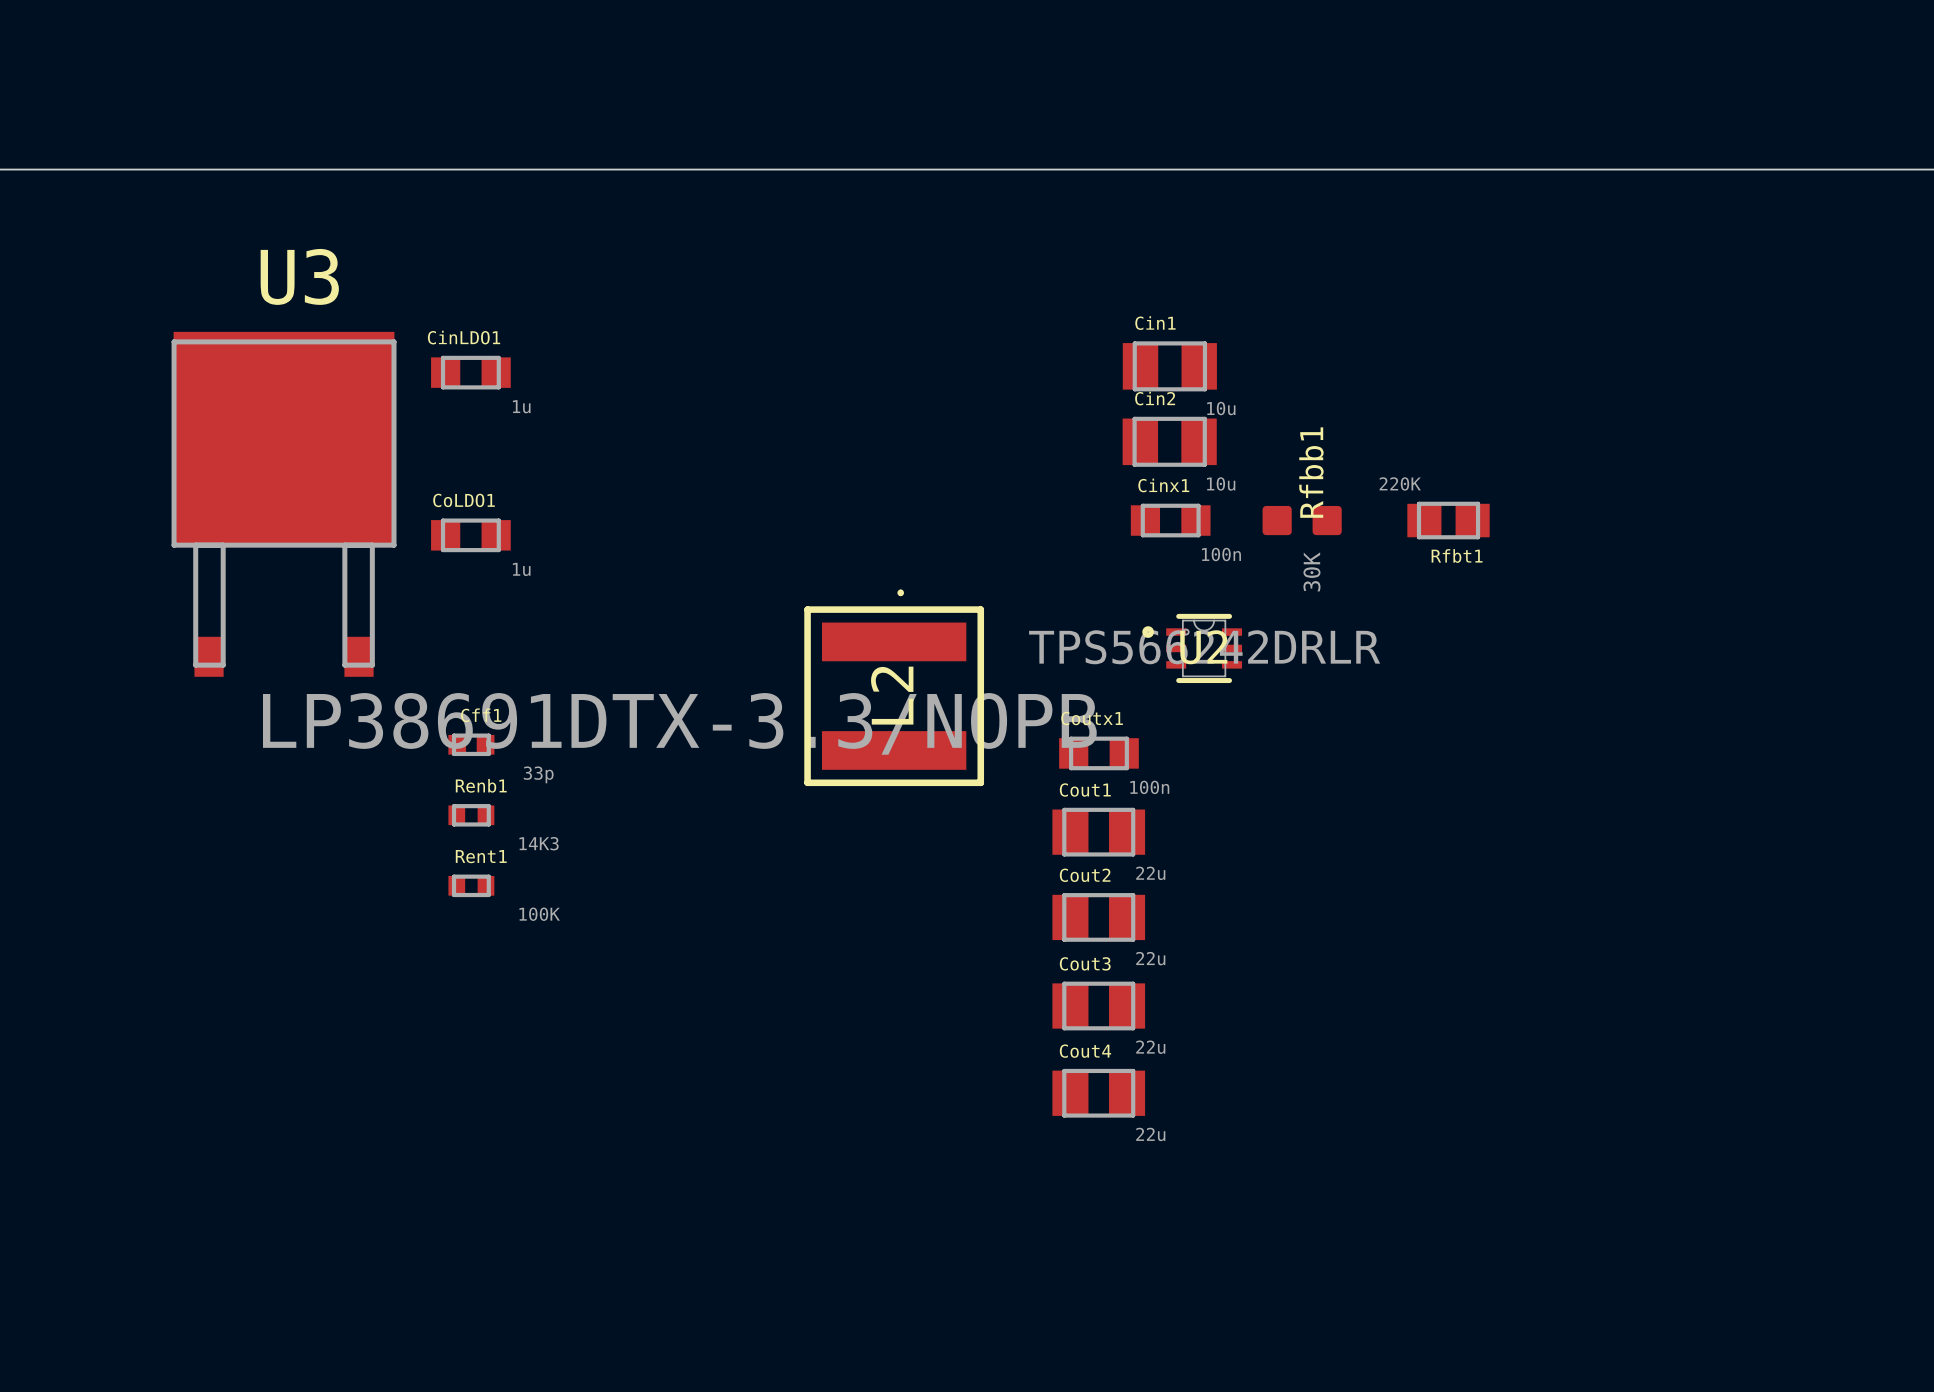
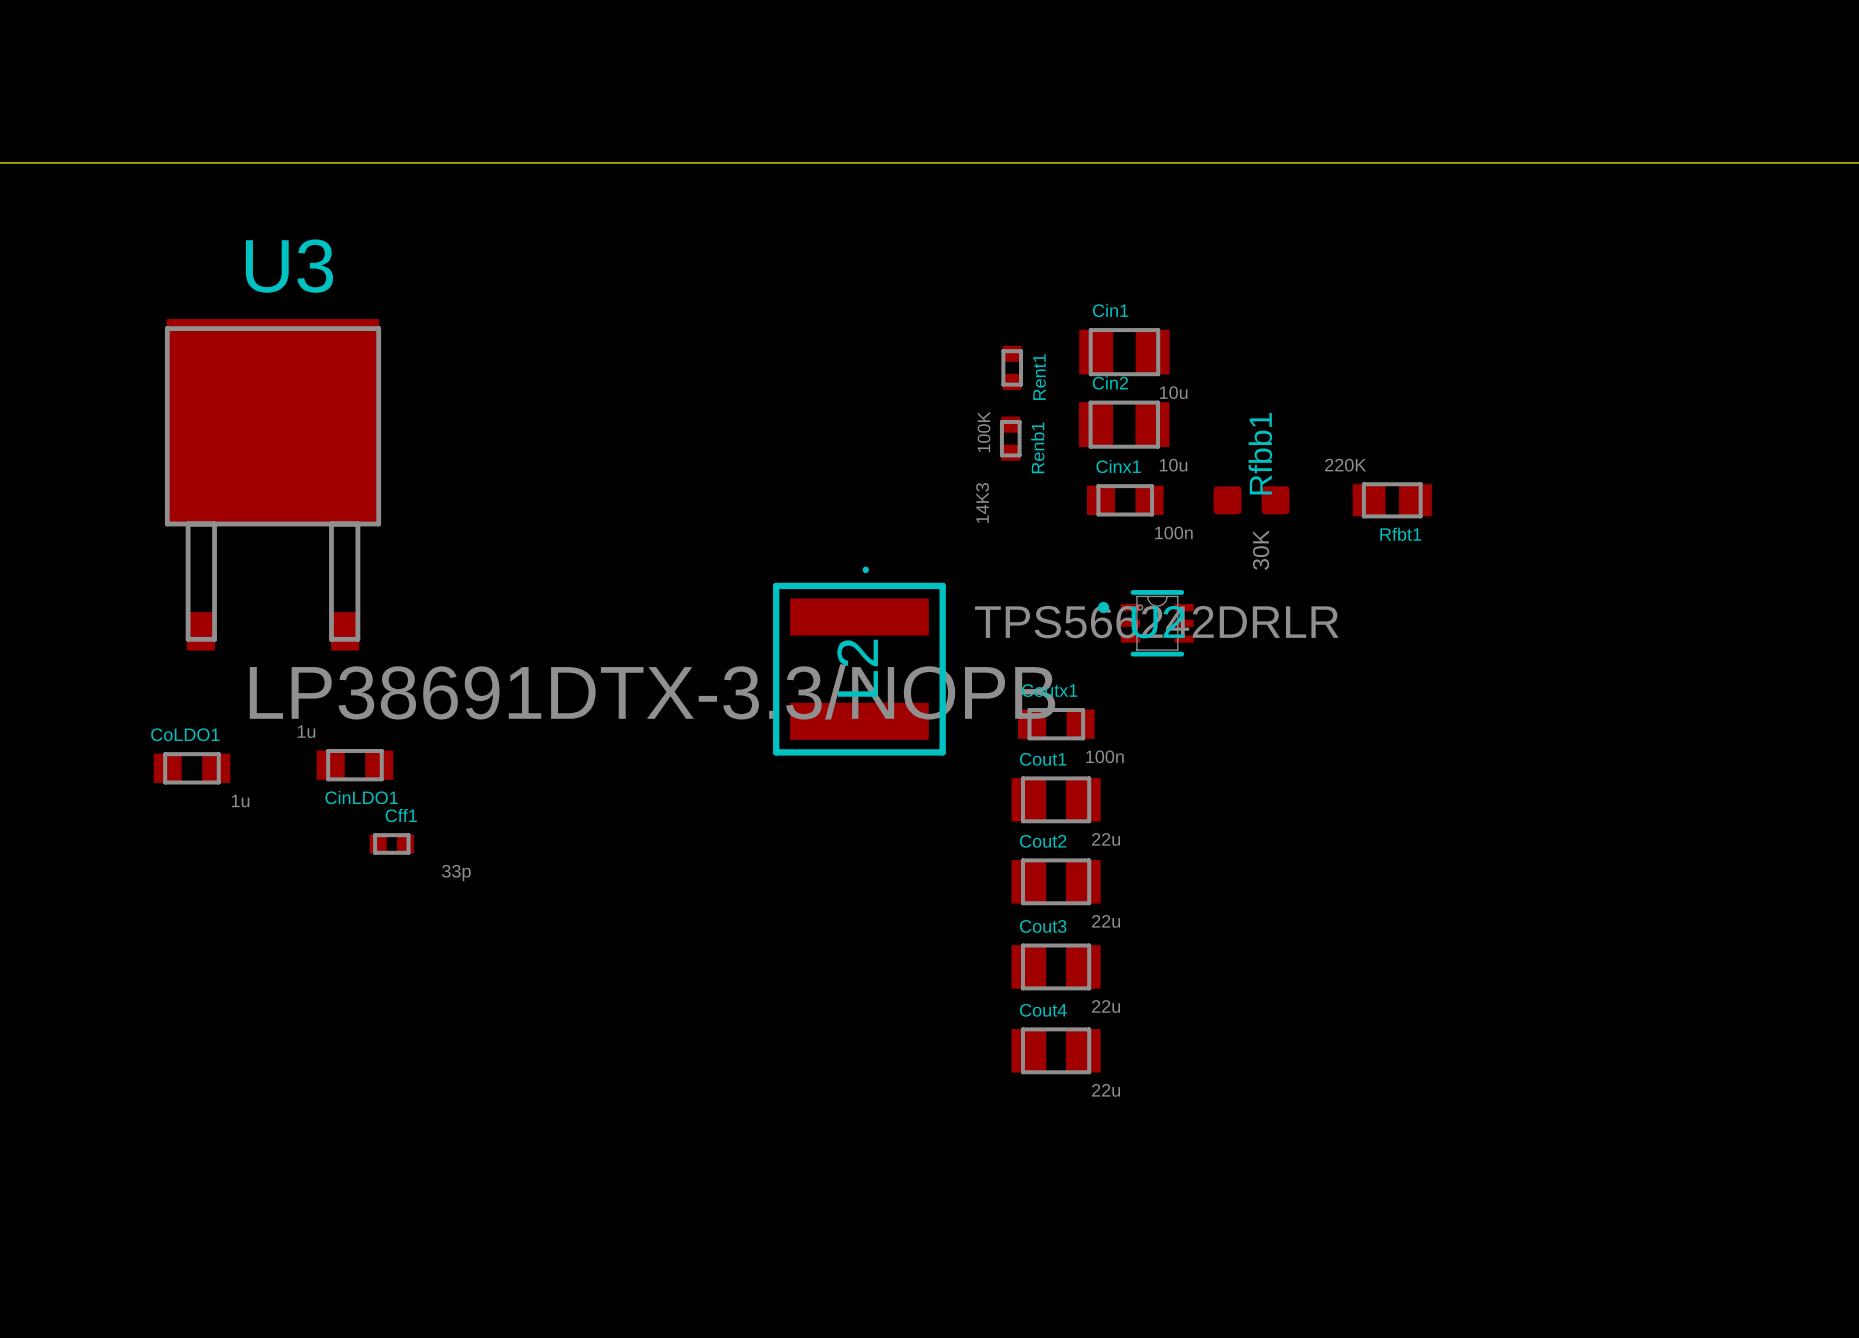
CinLDO1 name position: CinLDO1 (464, 337) -> CinLDO1 (361, 797)
CinLDO1 position: (470, 372) -> (354, 765)
CinLDO1 value position: 1u (521, 406) -> 1u (306, 731)
CoLDO1 position: (470, 535) -> (191, 768)
Cff1 position: (471, 744) -> (391, 843)
Renb1 rotation: 0° (471, 815) -> 90° clockwise (1010, 438)
Renb1 position: (471, 815) -> (1010, 438)
Rent1 rotation: 0° (471, 885) -> 90° clockwise (1012, 367)
Rent1 position: (471, 885) -> (1012, 367)

